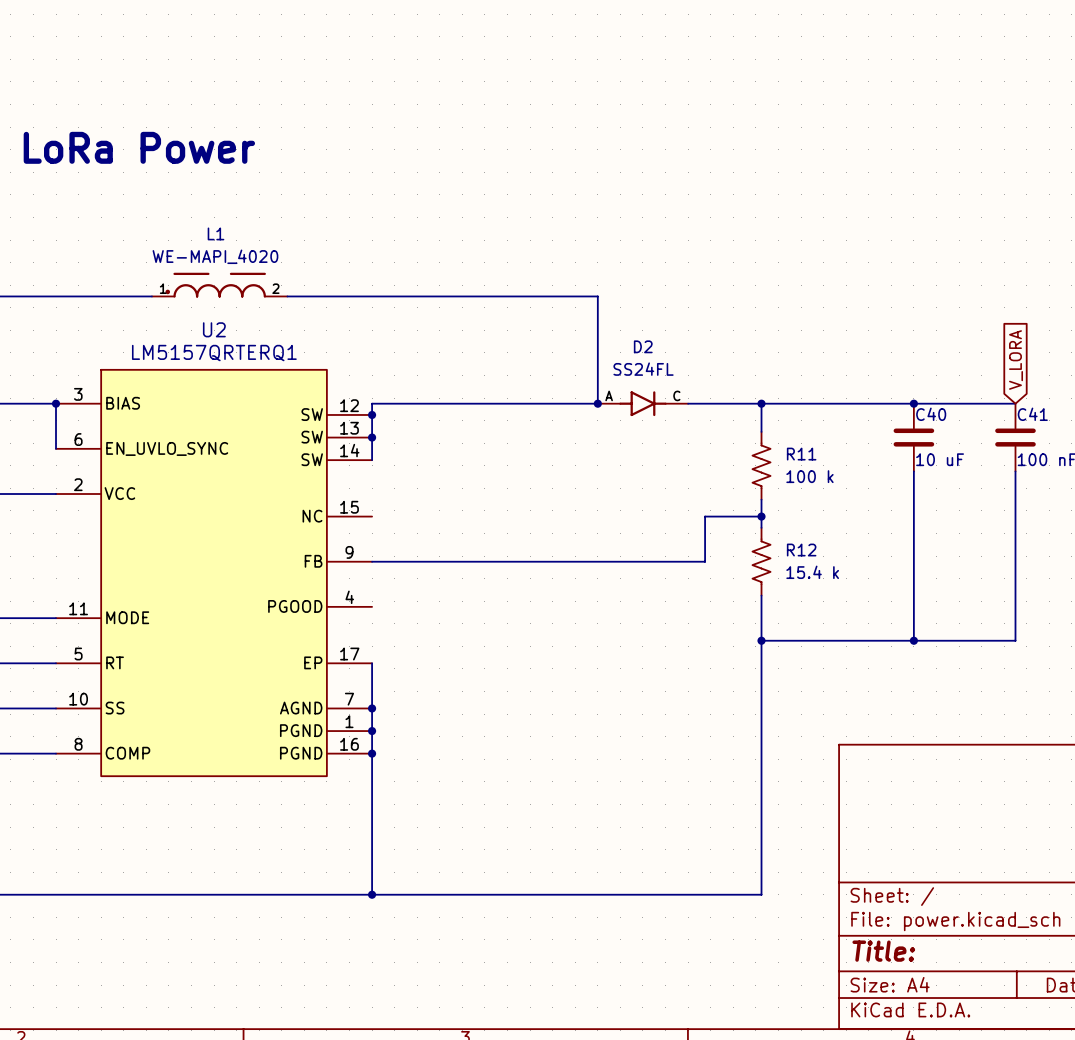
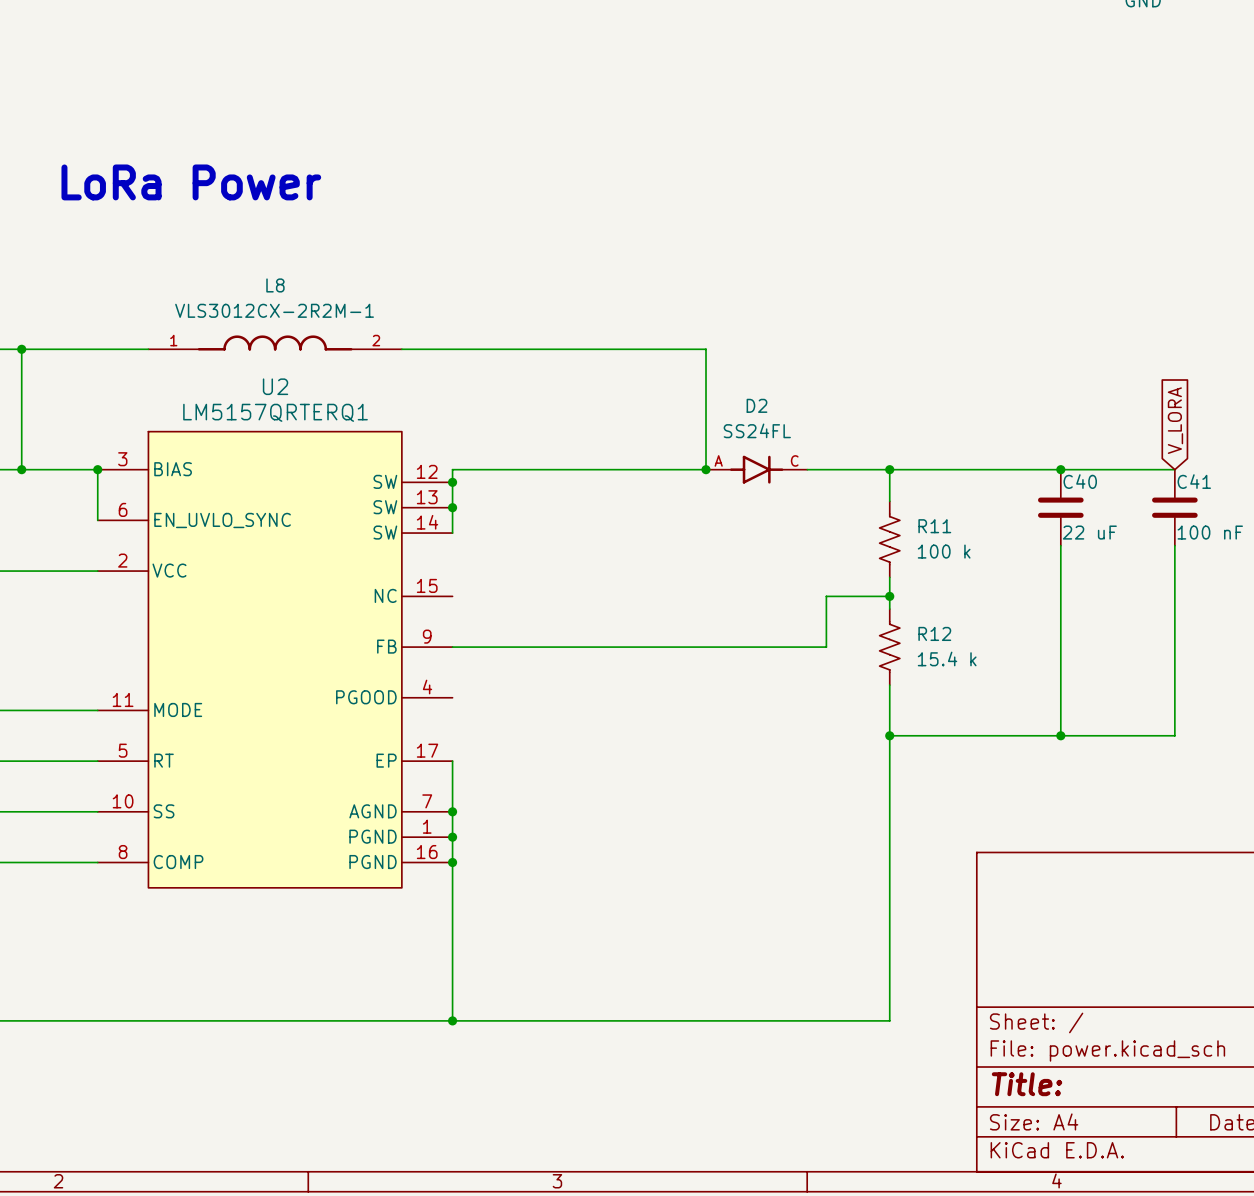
L1: WE-MAPI_4020 (219, 285) -> none
L8: none -> VLS3012CX-2R2M-1 (275, 342)
C40 value: 10 uF (940, 459) -> 22 uF (1089, 532)

